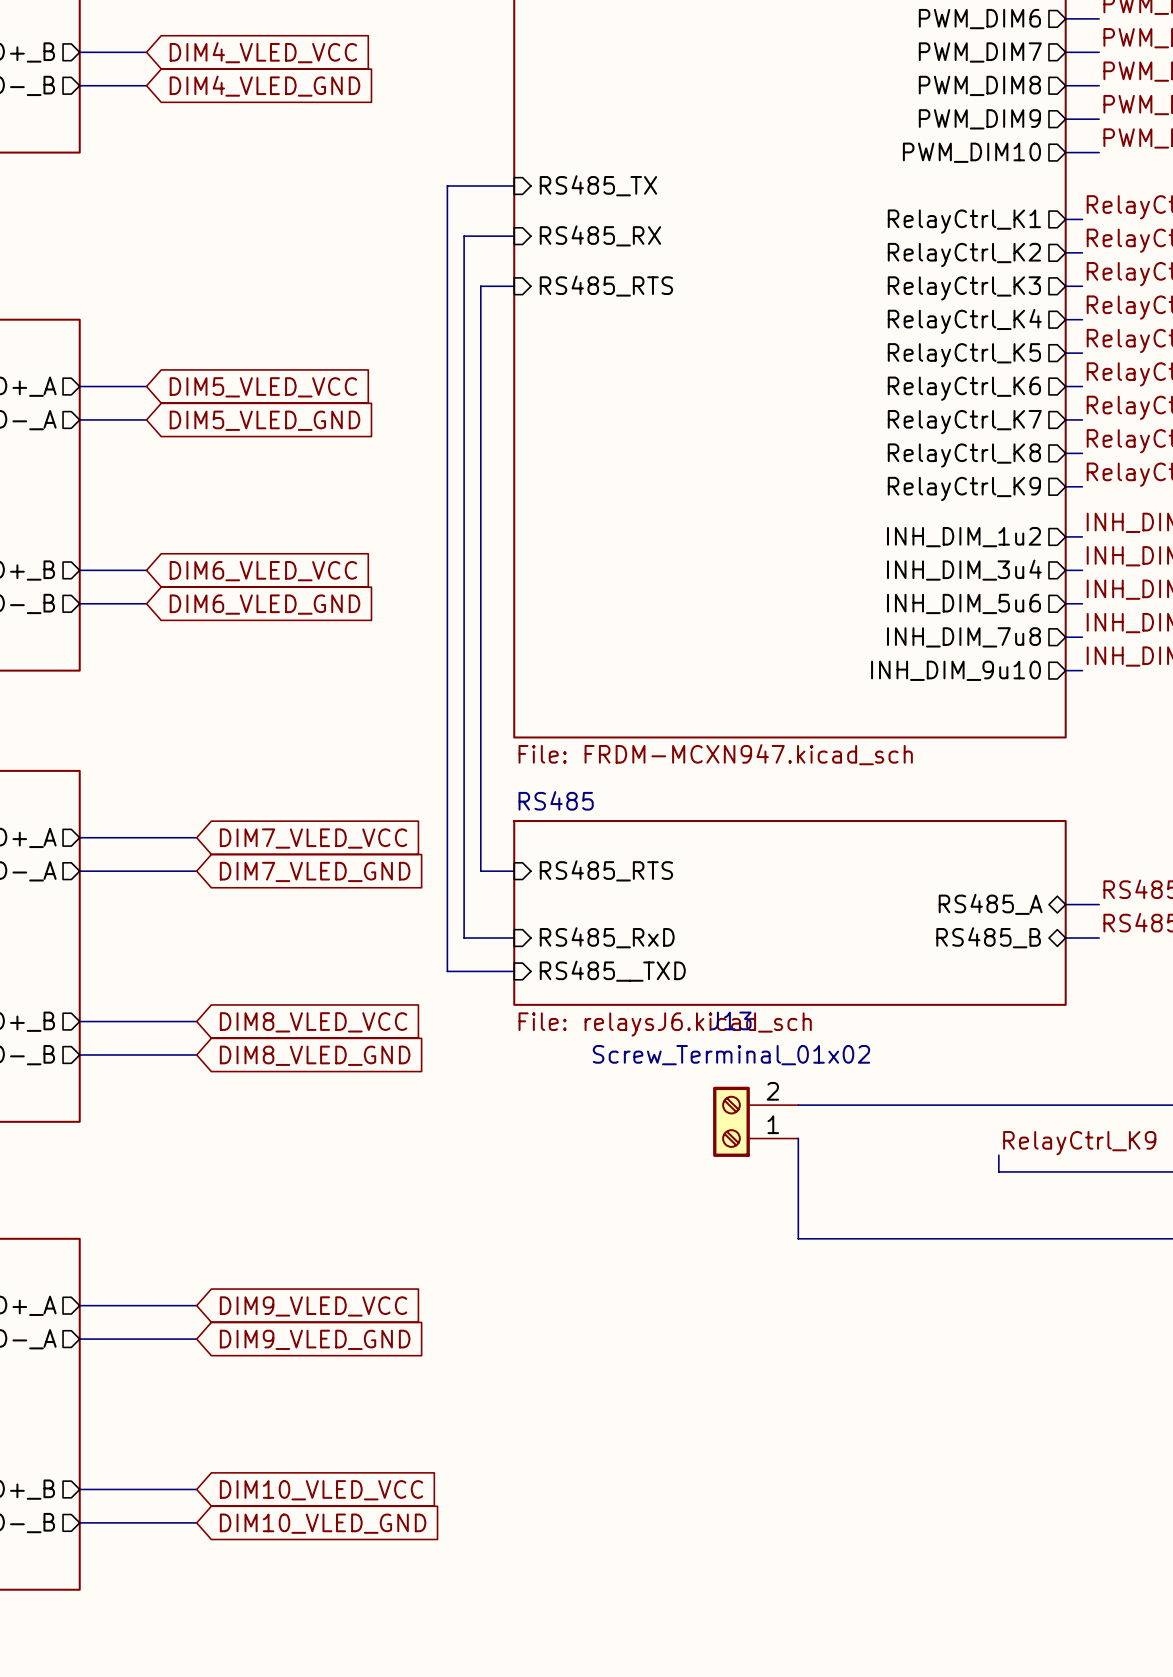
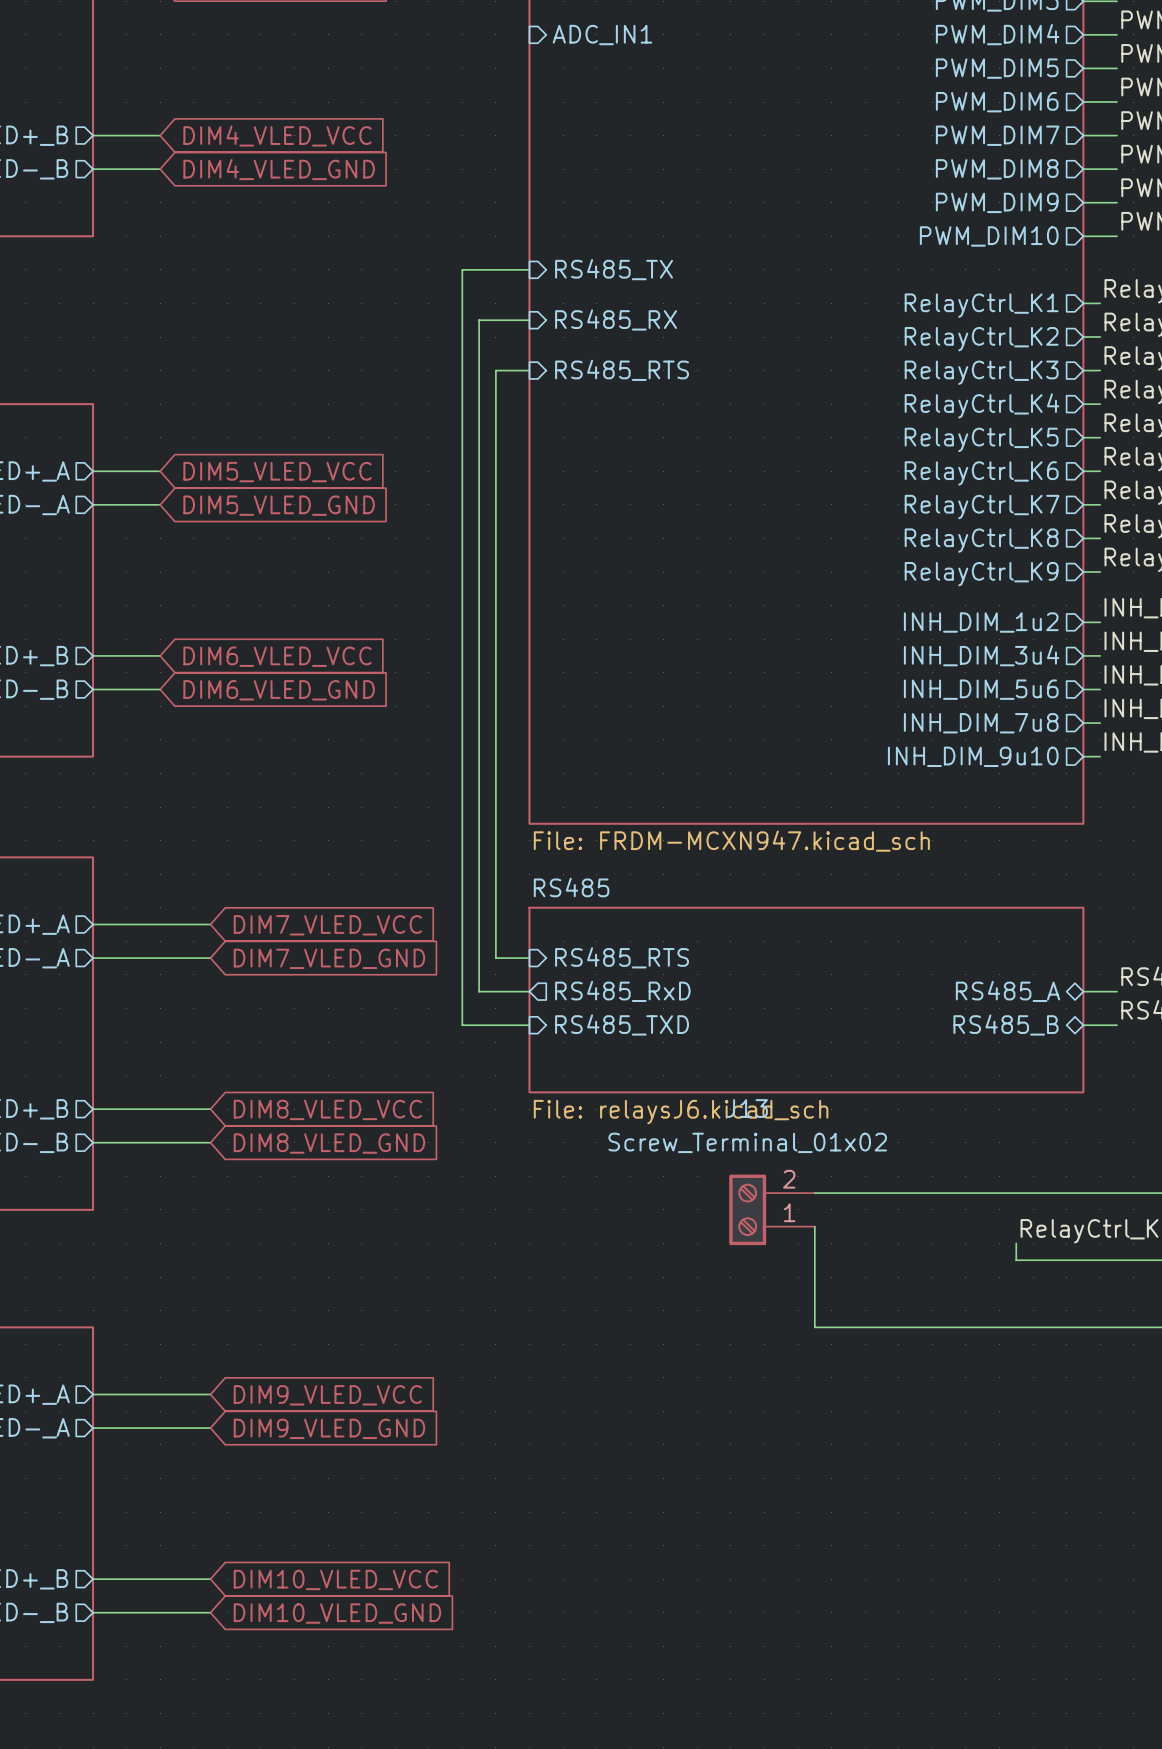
wire: (464, 904) (464, 938) -> (462, 1025) (479, 1025)
wire: none -> (479, 991) (529, 991)
sheet pin: none -> RS485_RxD (622, 991)
sheet pin: RS485_RxD (607, 937) -> RS485_TXD (622, 1024)
wire: (447, 938) (447, 971) (514, 971) -> none
sheet pin: RS485__TXD (612, 971) -> none

